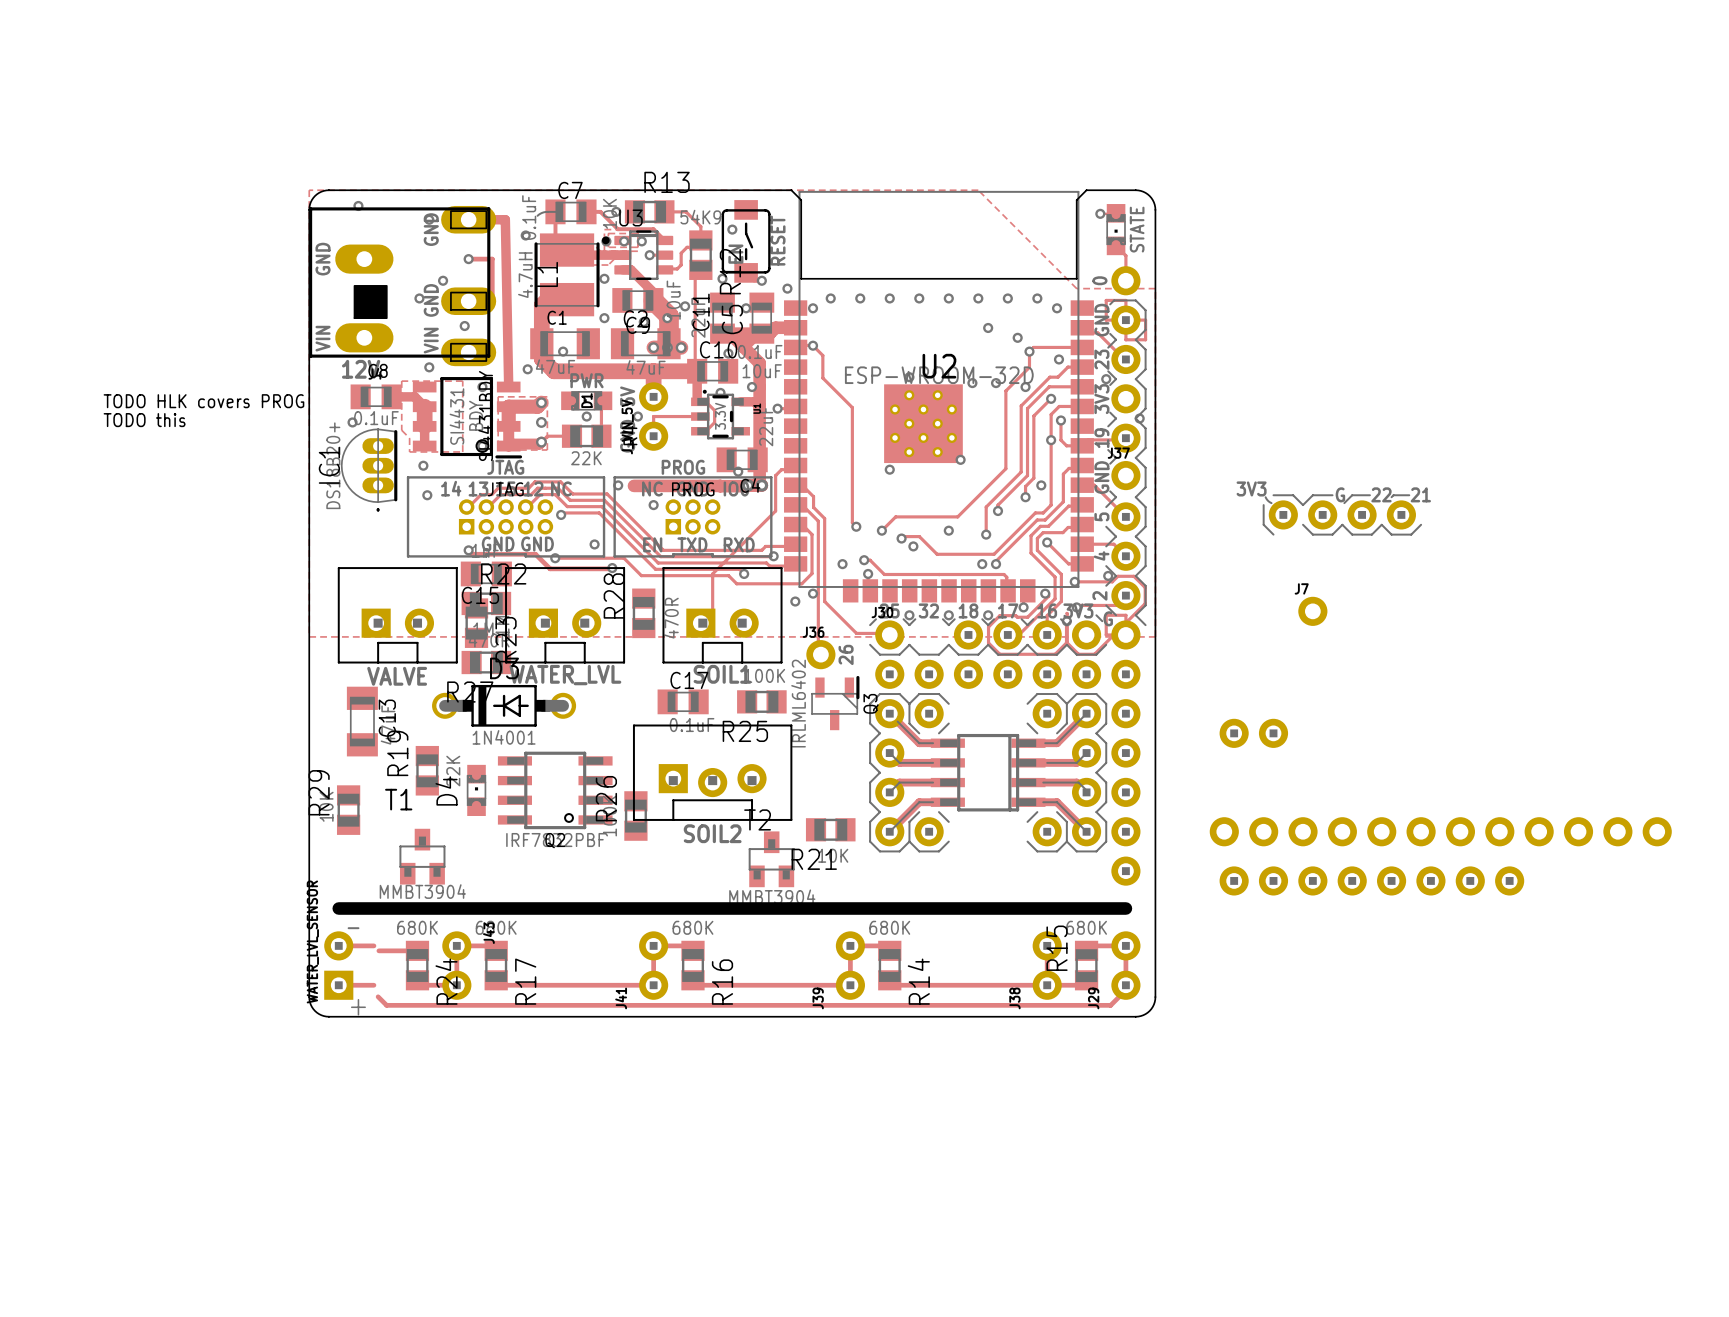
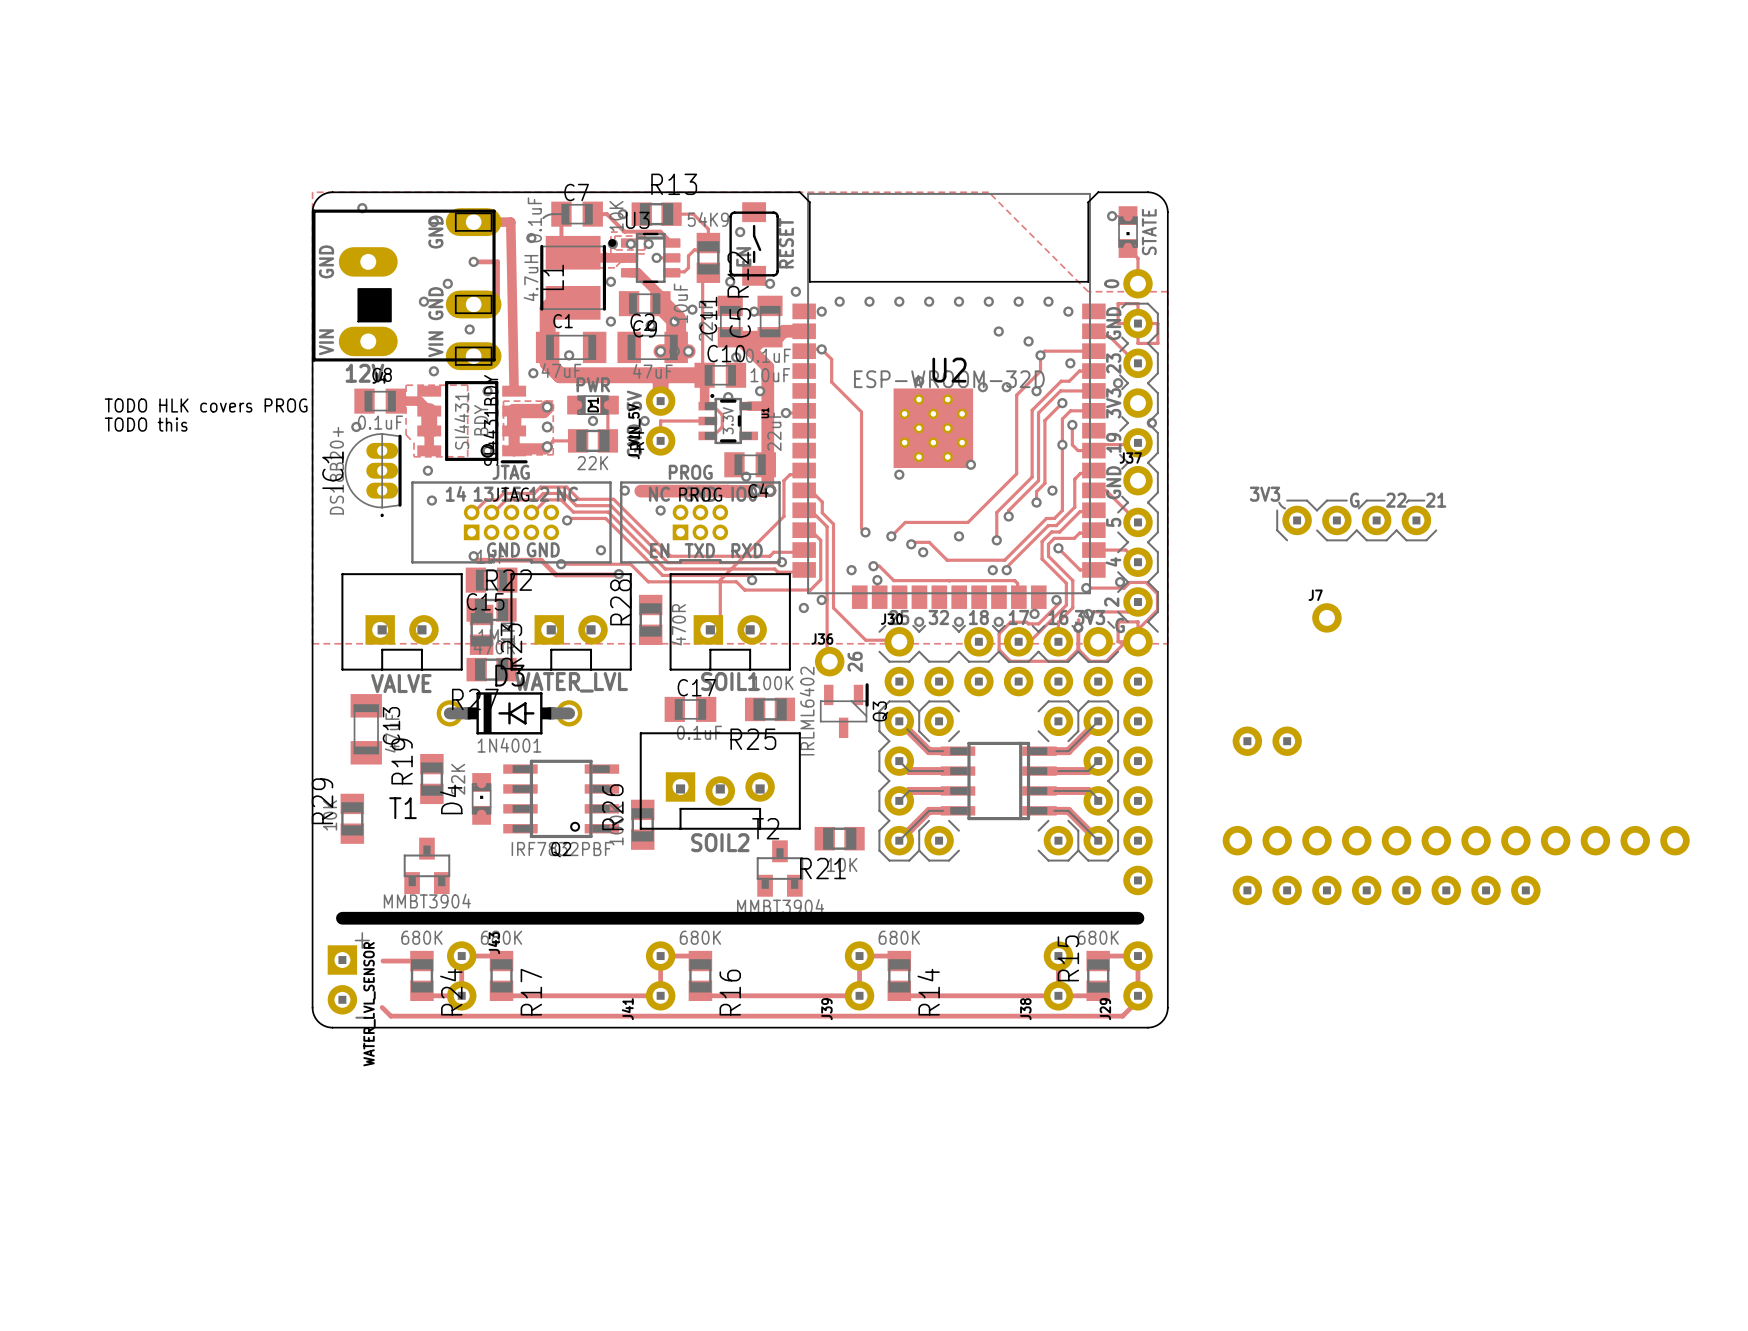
line: (348, 928) (358, 928) -> (356, 1017) (366, 1017)
track: (338, 945) (373, 945) -> none
WATER_LVL_SENSOR rotation: 0° (338, 965) -> 180° (342, 979)
track: (338, 985) (373, 985) -> none
text position: + (358, 1007) -> + (362, 940)

